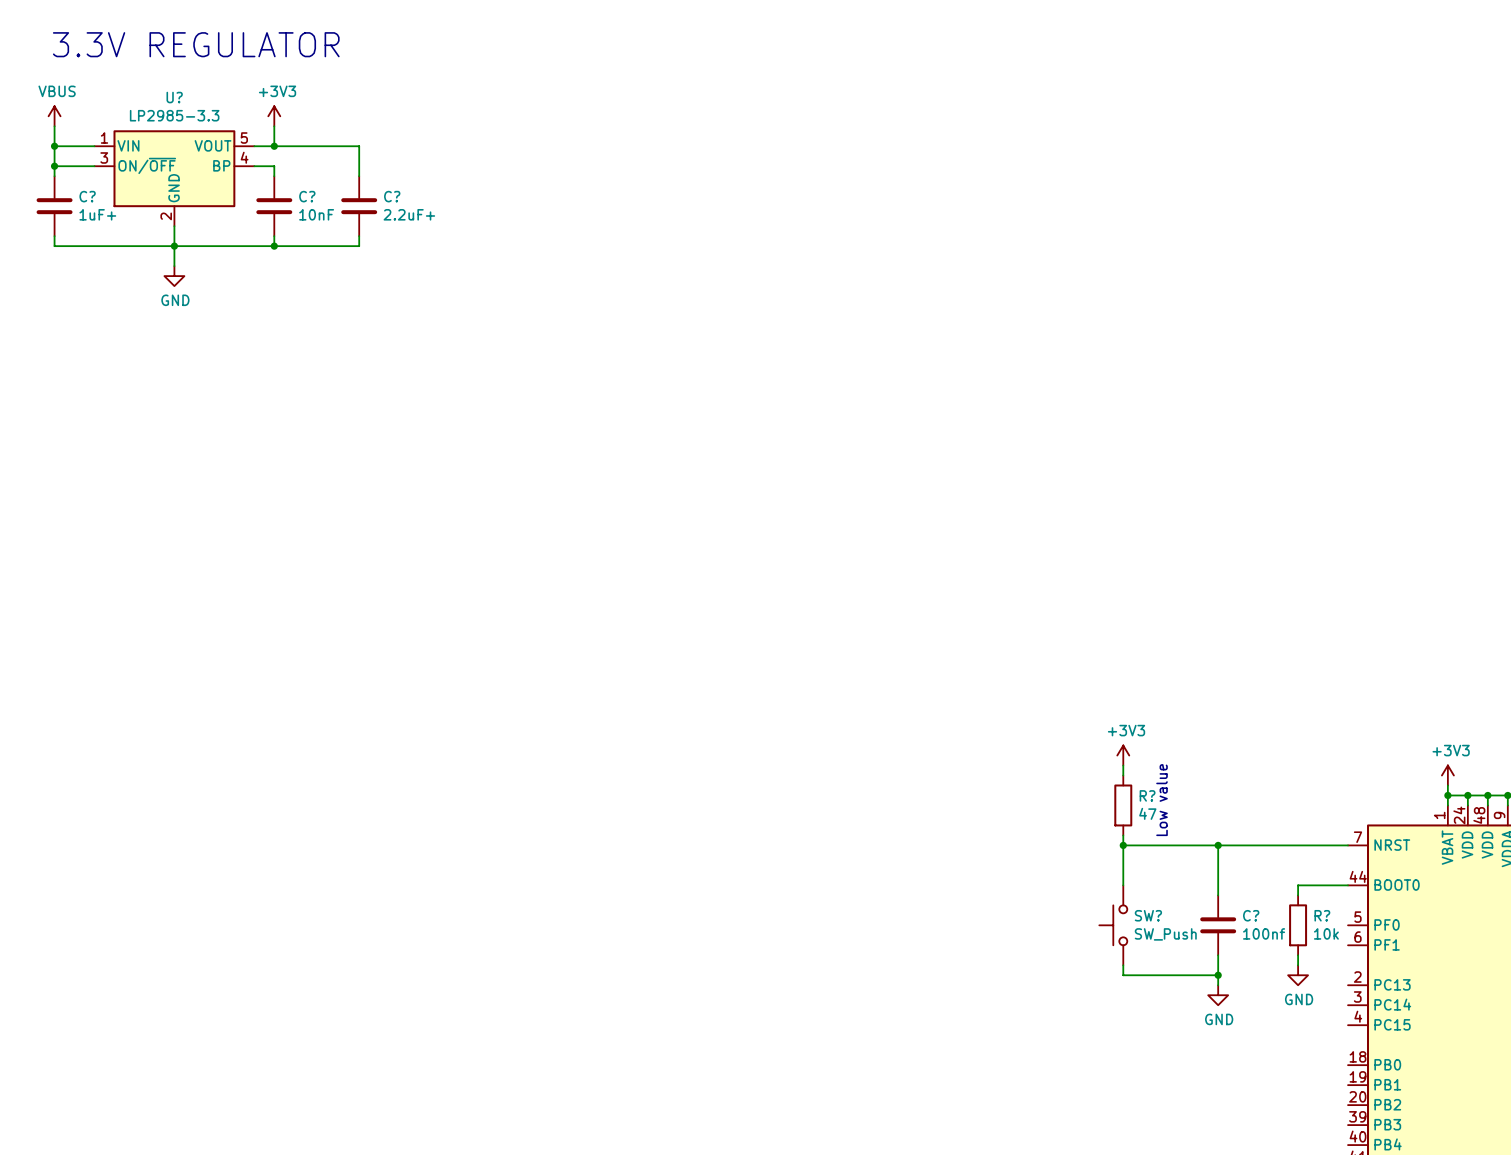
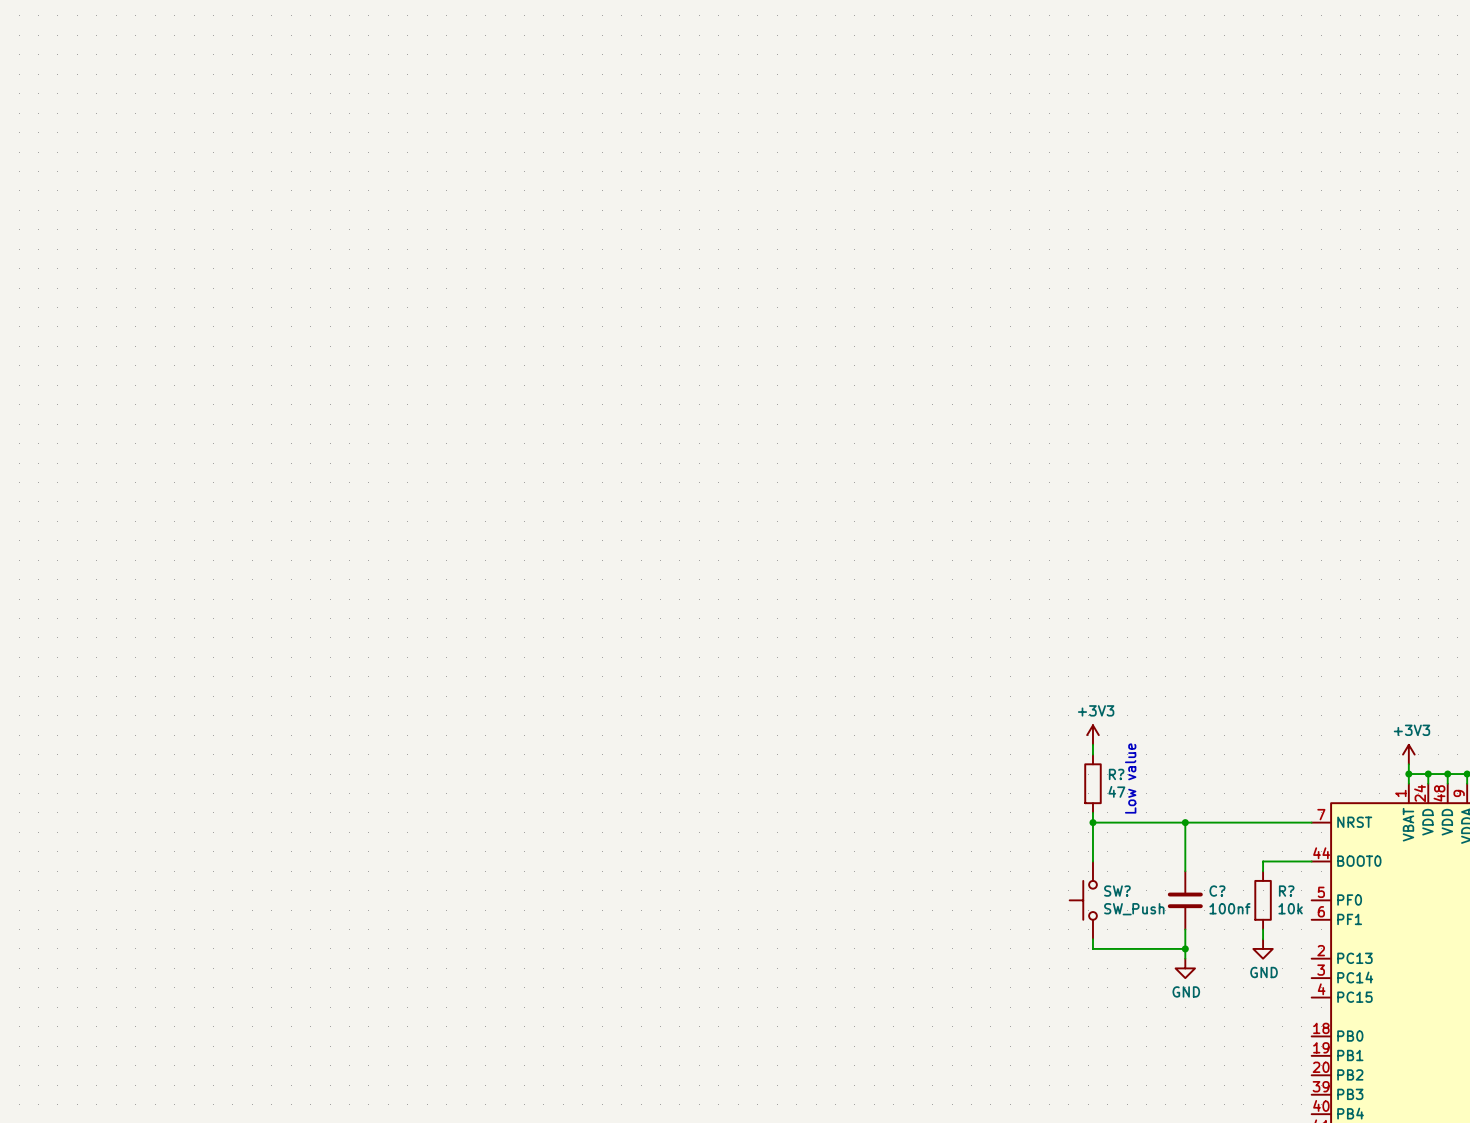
text: 3.3V REGULATOR (196, 44) -> none
power symbol: VBUS (54, 116) -> none
power symbol: +3V3 (274, 116) -> none
wire: (54, 126) (54, 176) -> none
wire: (274, 126) (274, 146) -> none
wire: (54, 146) (94, 146) -> none
junction: (54, 146) -> none
wire: (254, 146) (359, 146) (359, 176) -> none
junction: (274, 146) -> none
wire: (54, 166) (94, 166) -> none
junction: (54, 166) -> none
wire: (254, 166) (274, 166) (274, 176) -> none
U?: LP2985-3.3 (174, 178) -> none
C?: 1uF+ (54, 206) -> none
C?: 10nF (274, 206) -> none
C?: 2.2uF+ (359, 206) -> none
wire: (174, 226) (174, 266) -> none
wire: (54, 236) (54, 246) (359, 246) (359, 236) -> none
wire: (274, 236) (274, 246) -> none
junction: (174, 246) -> none
junction: (274, 246) -> none
power symbol: GND (174, 276) -> none

